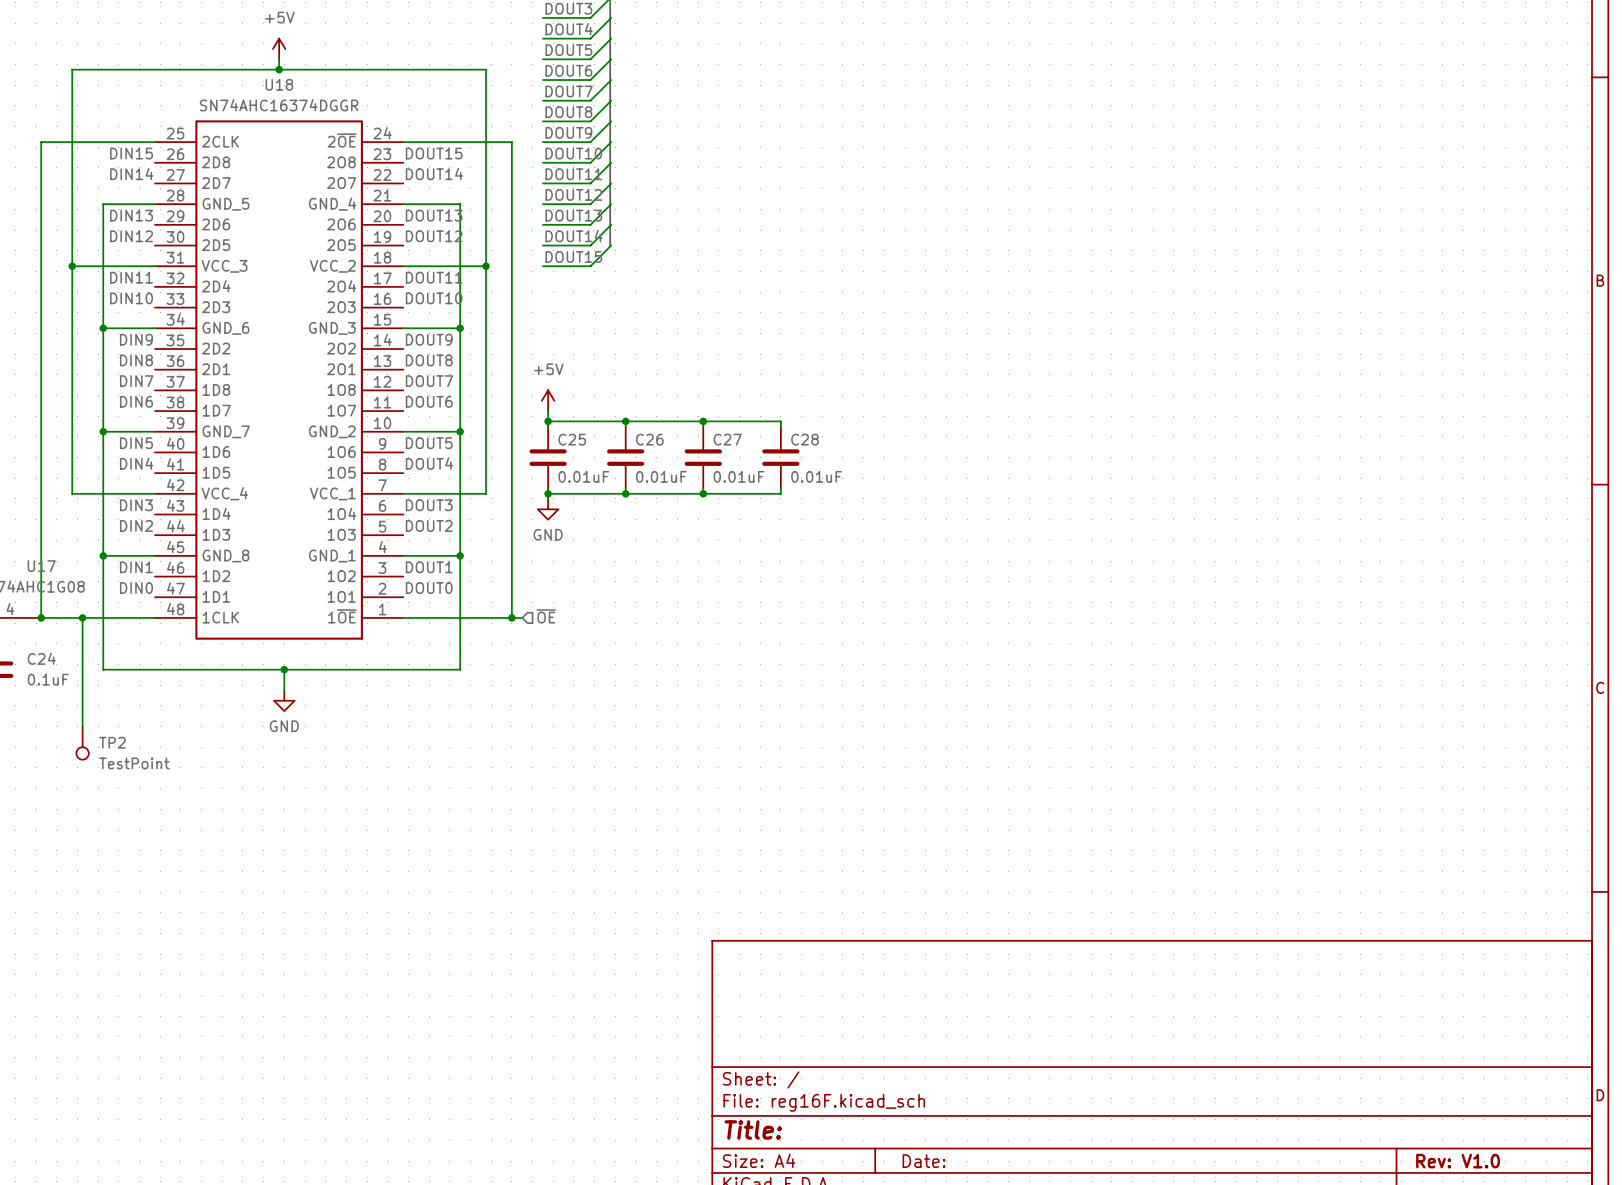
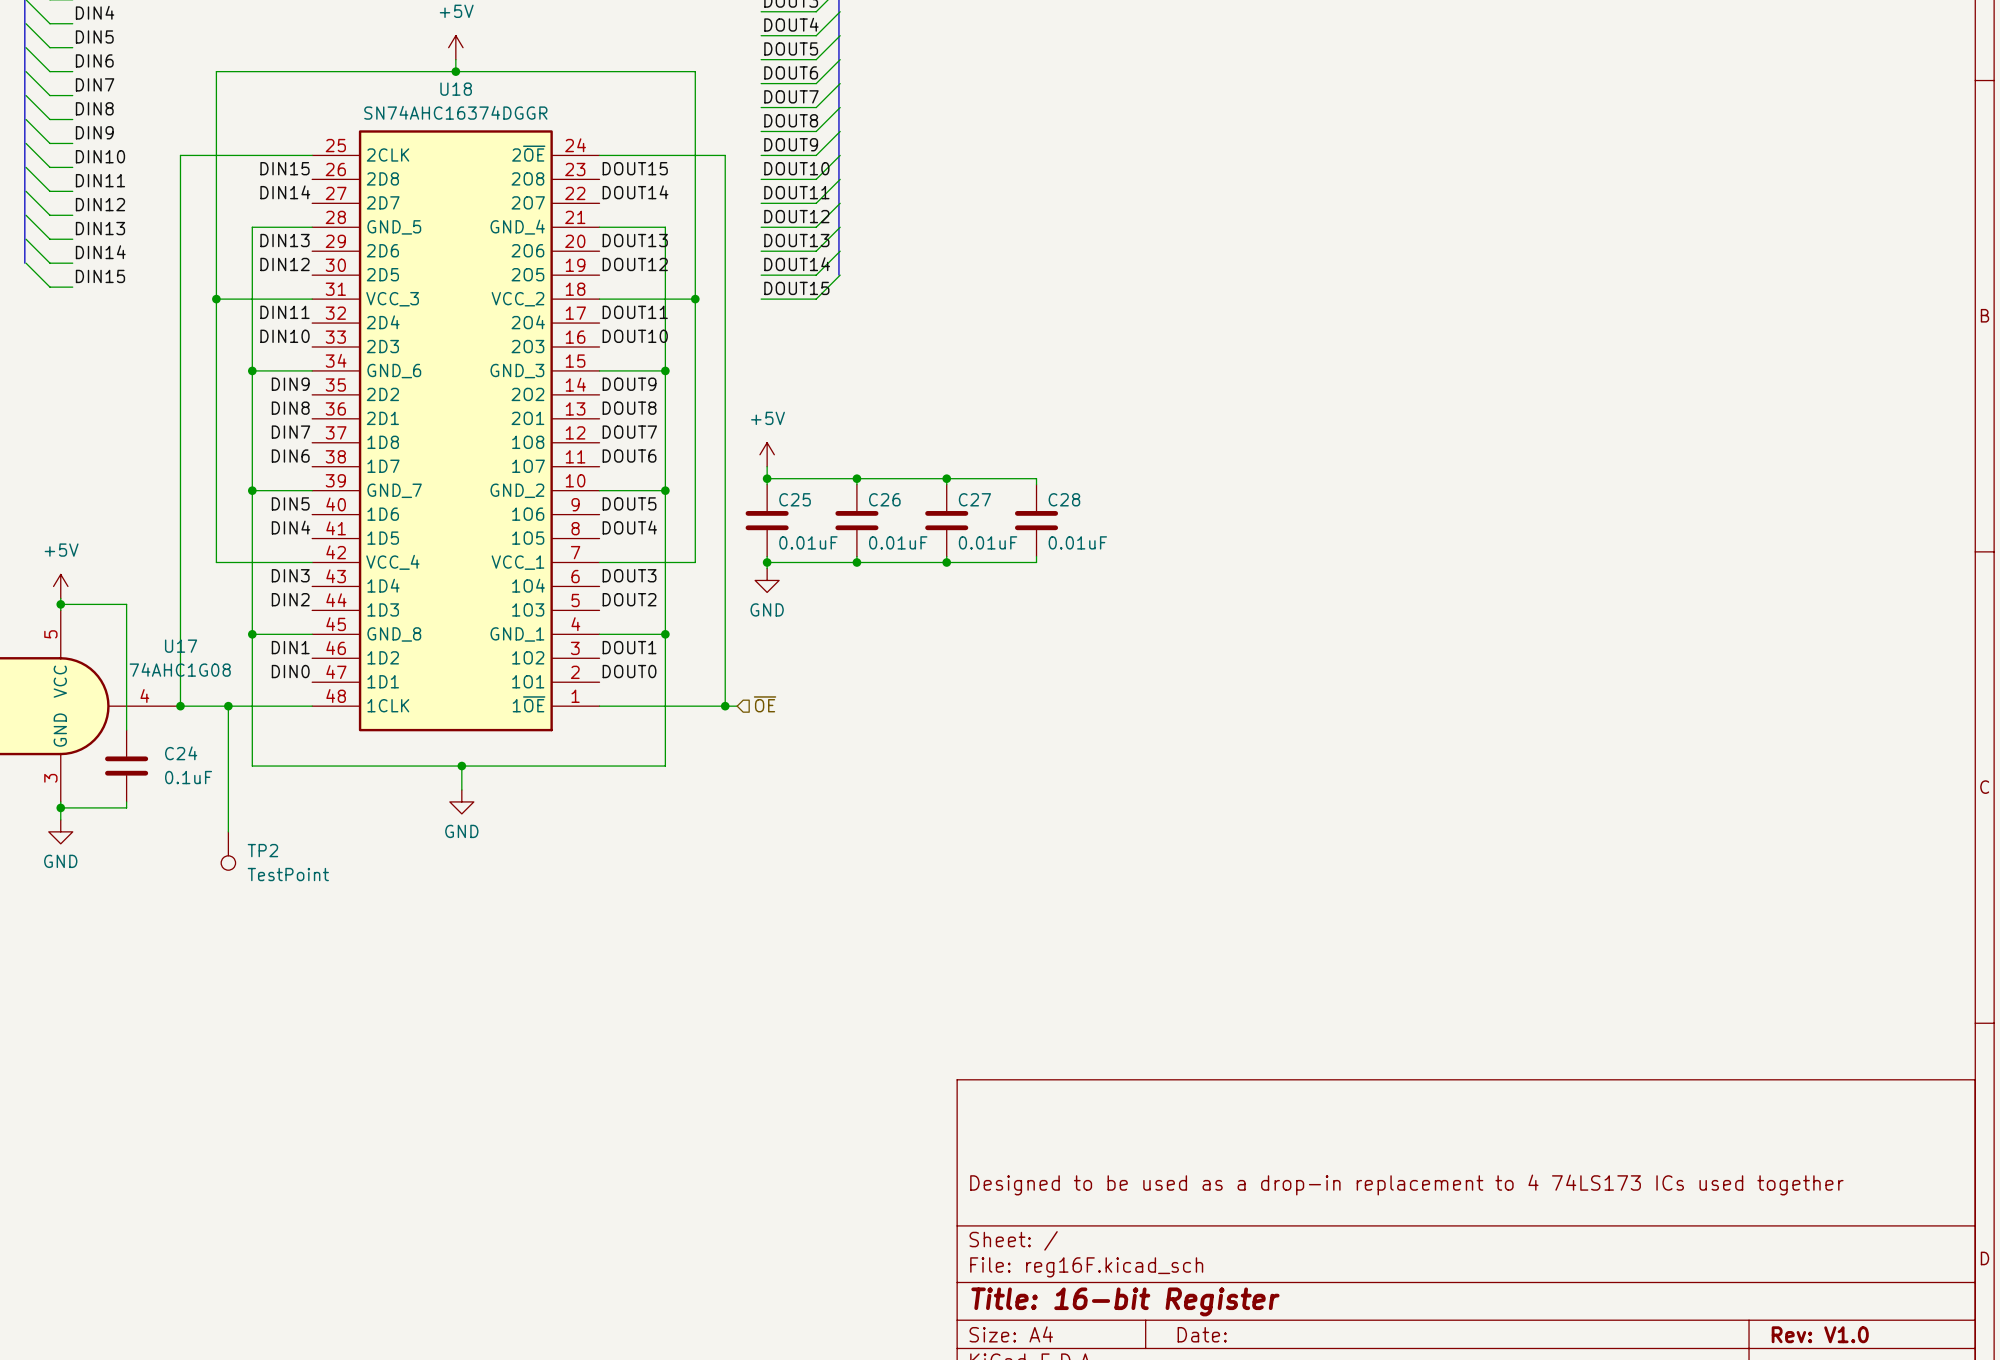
title block: none -> Designed to be used as a drop-in replacement to 4 74LS173 ICs used together (1406, 1185)
title block: Title: (753, 1129) -> Title: 16-bit Register (1125, 1301)

